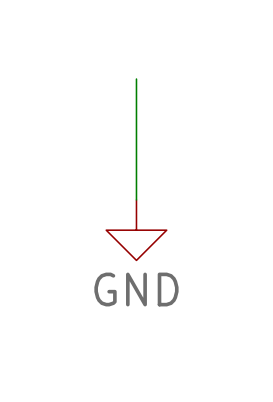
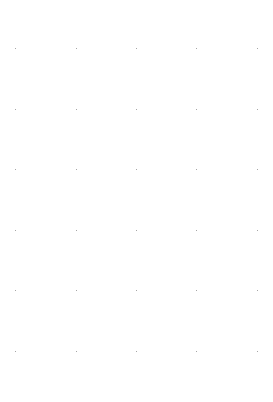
wire: (136, 79) (136, 199) -> none
power symbol: GND (136, 230) -> none

